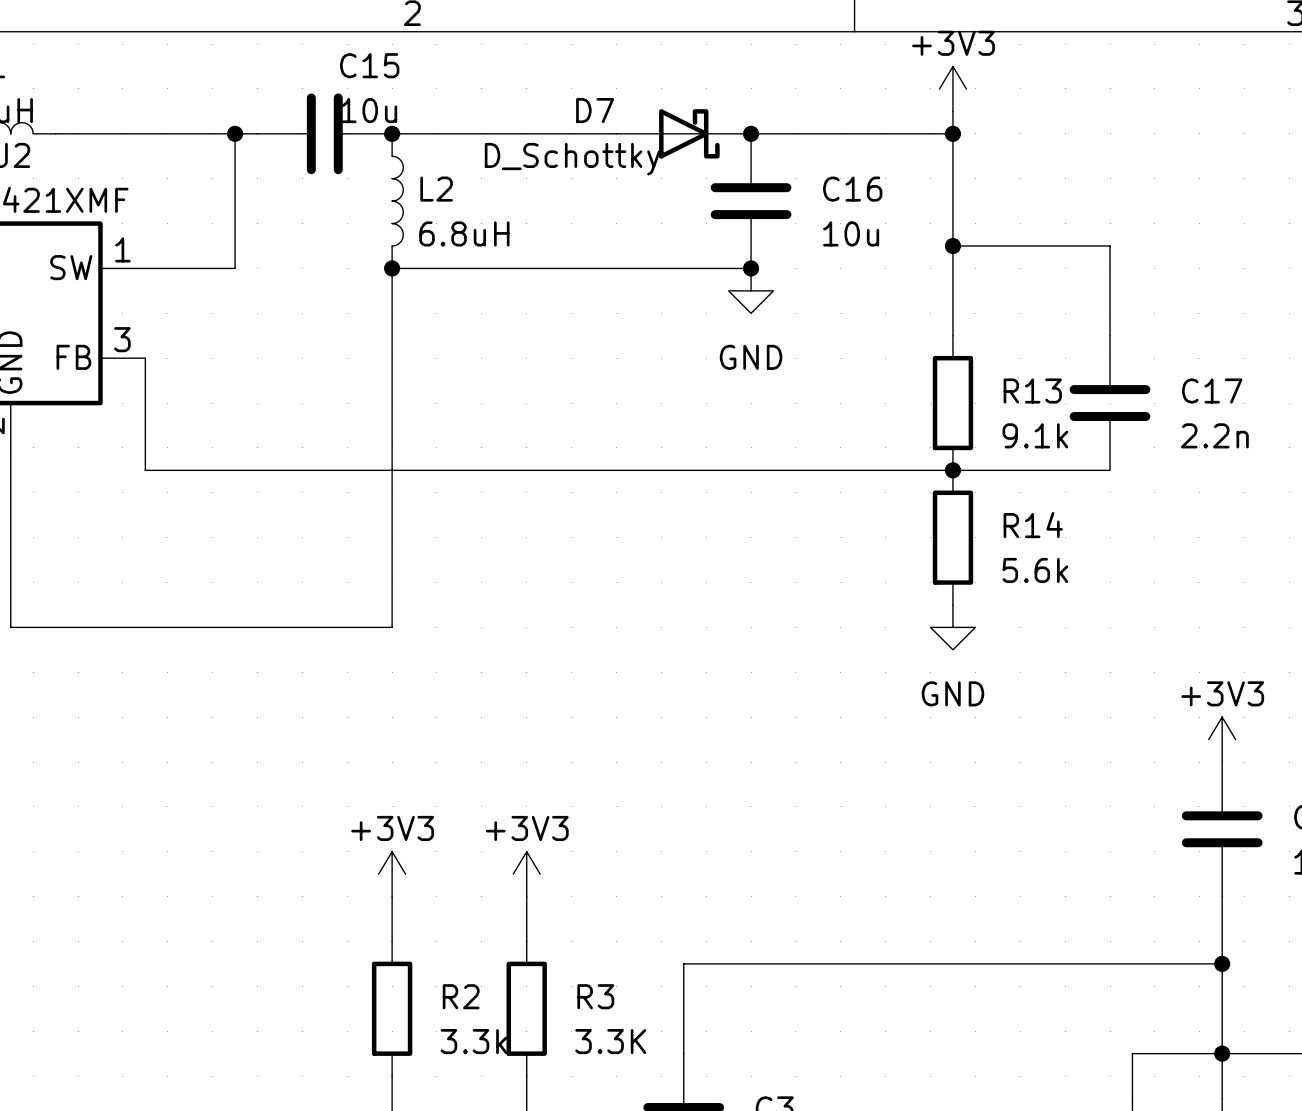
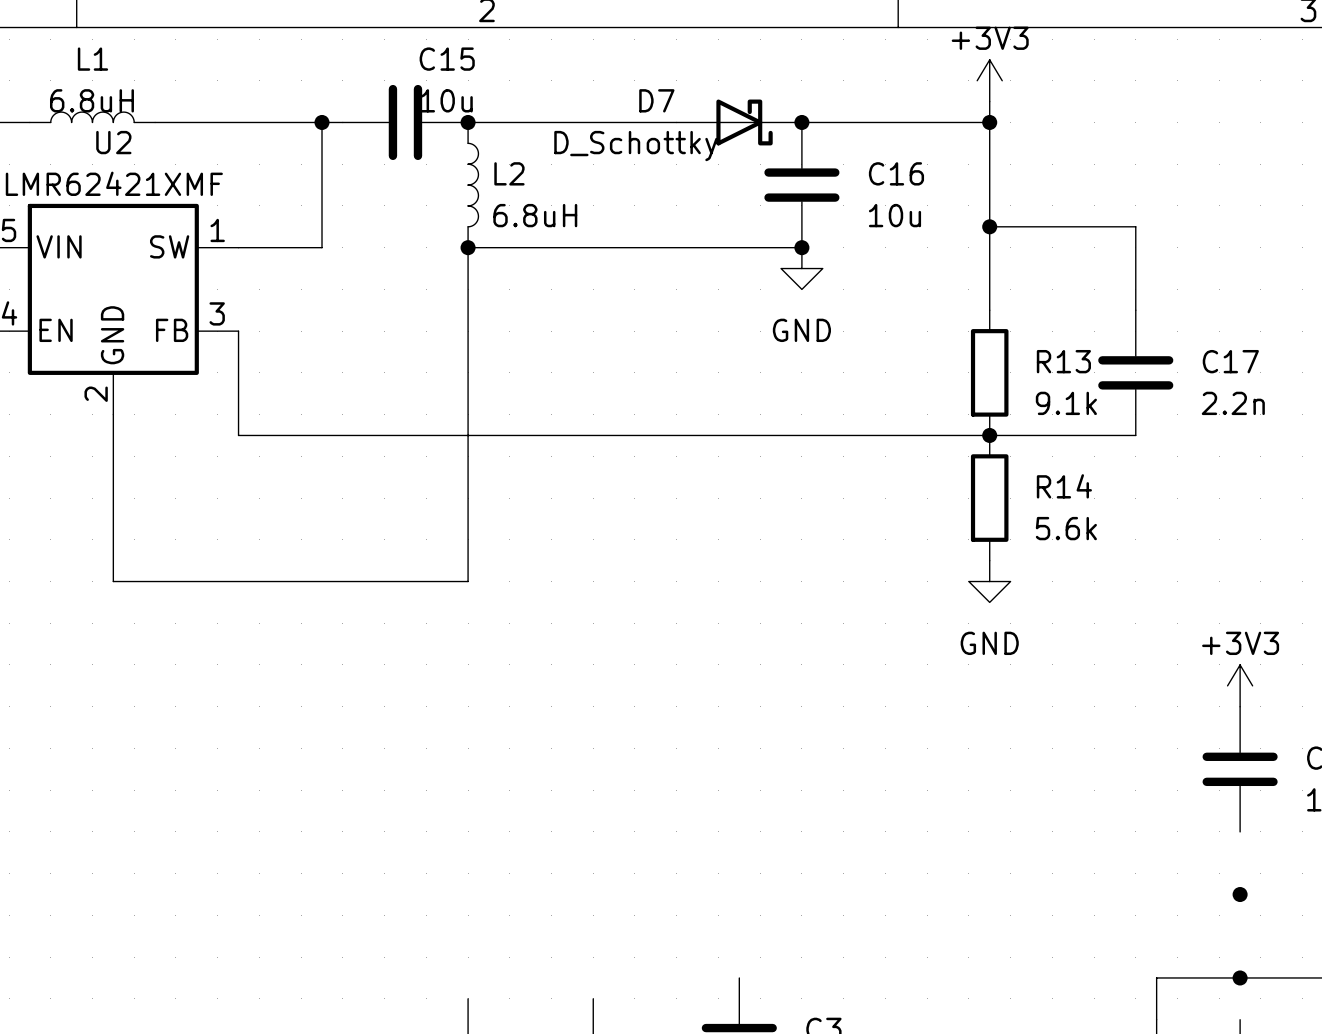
power symbol: +3V3 (392, 874) -> none
power symbol: +3V3 (526, 874) -> none
wire: (392, 896) (392, 941) -> none
wire: (526, 896) (526, 941) -> none
wire: (1222, 896) (1222, 1098) -> none
wire: (1222, 963) (683, 963) (683, 1053) -> none
R2: 3.3k (392, 1008) -> none
R3: 3.3K (526, 1008) -> none

